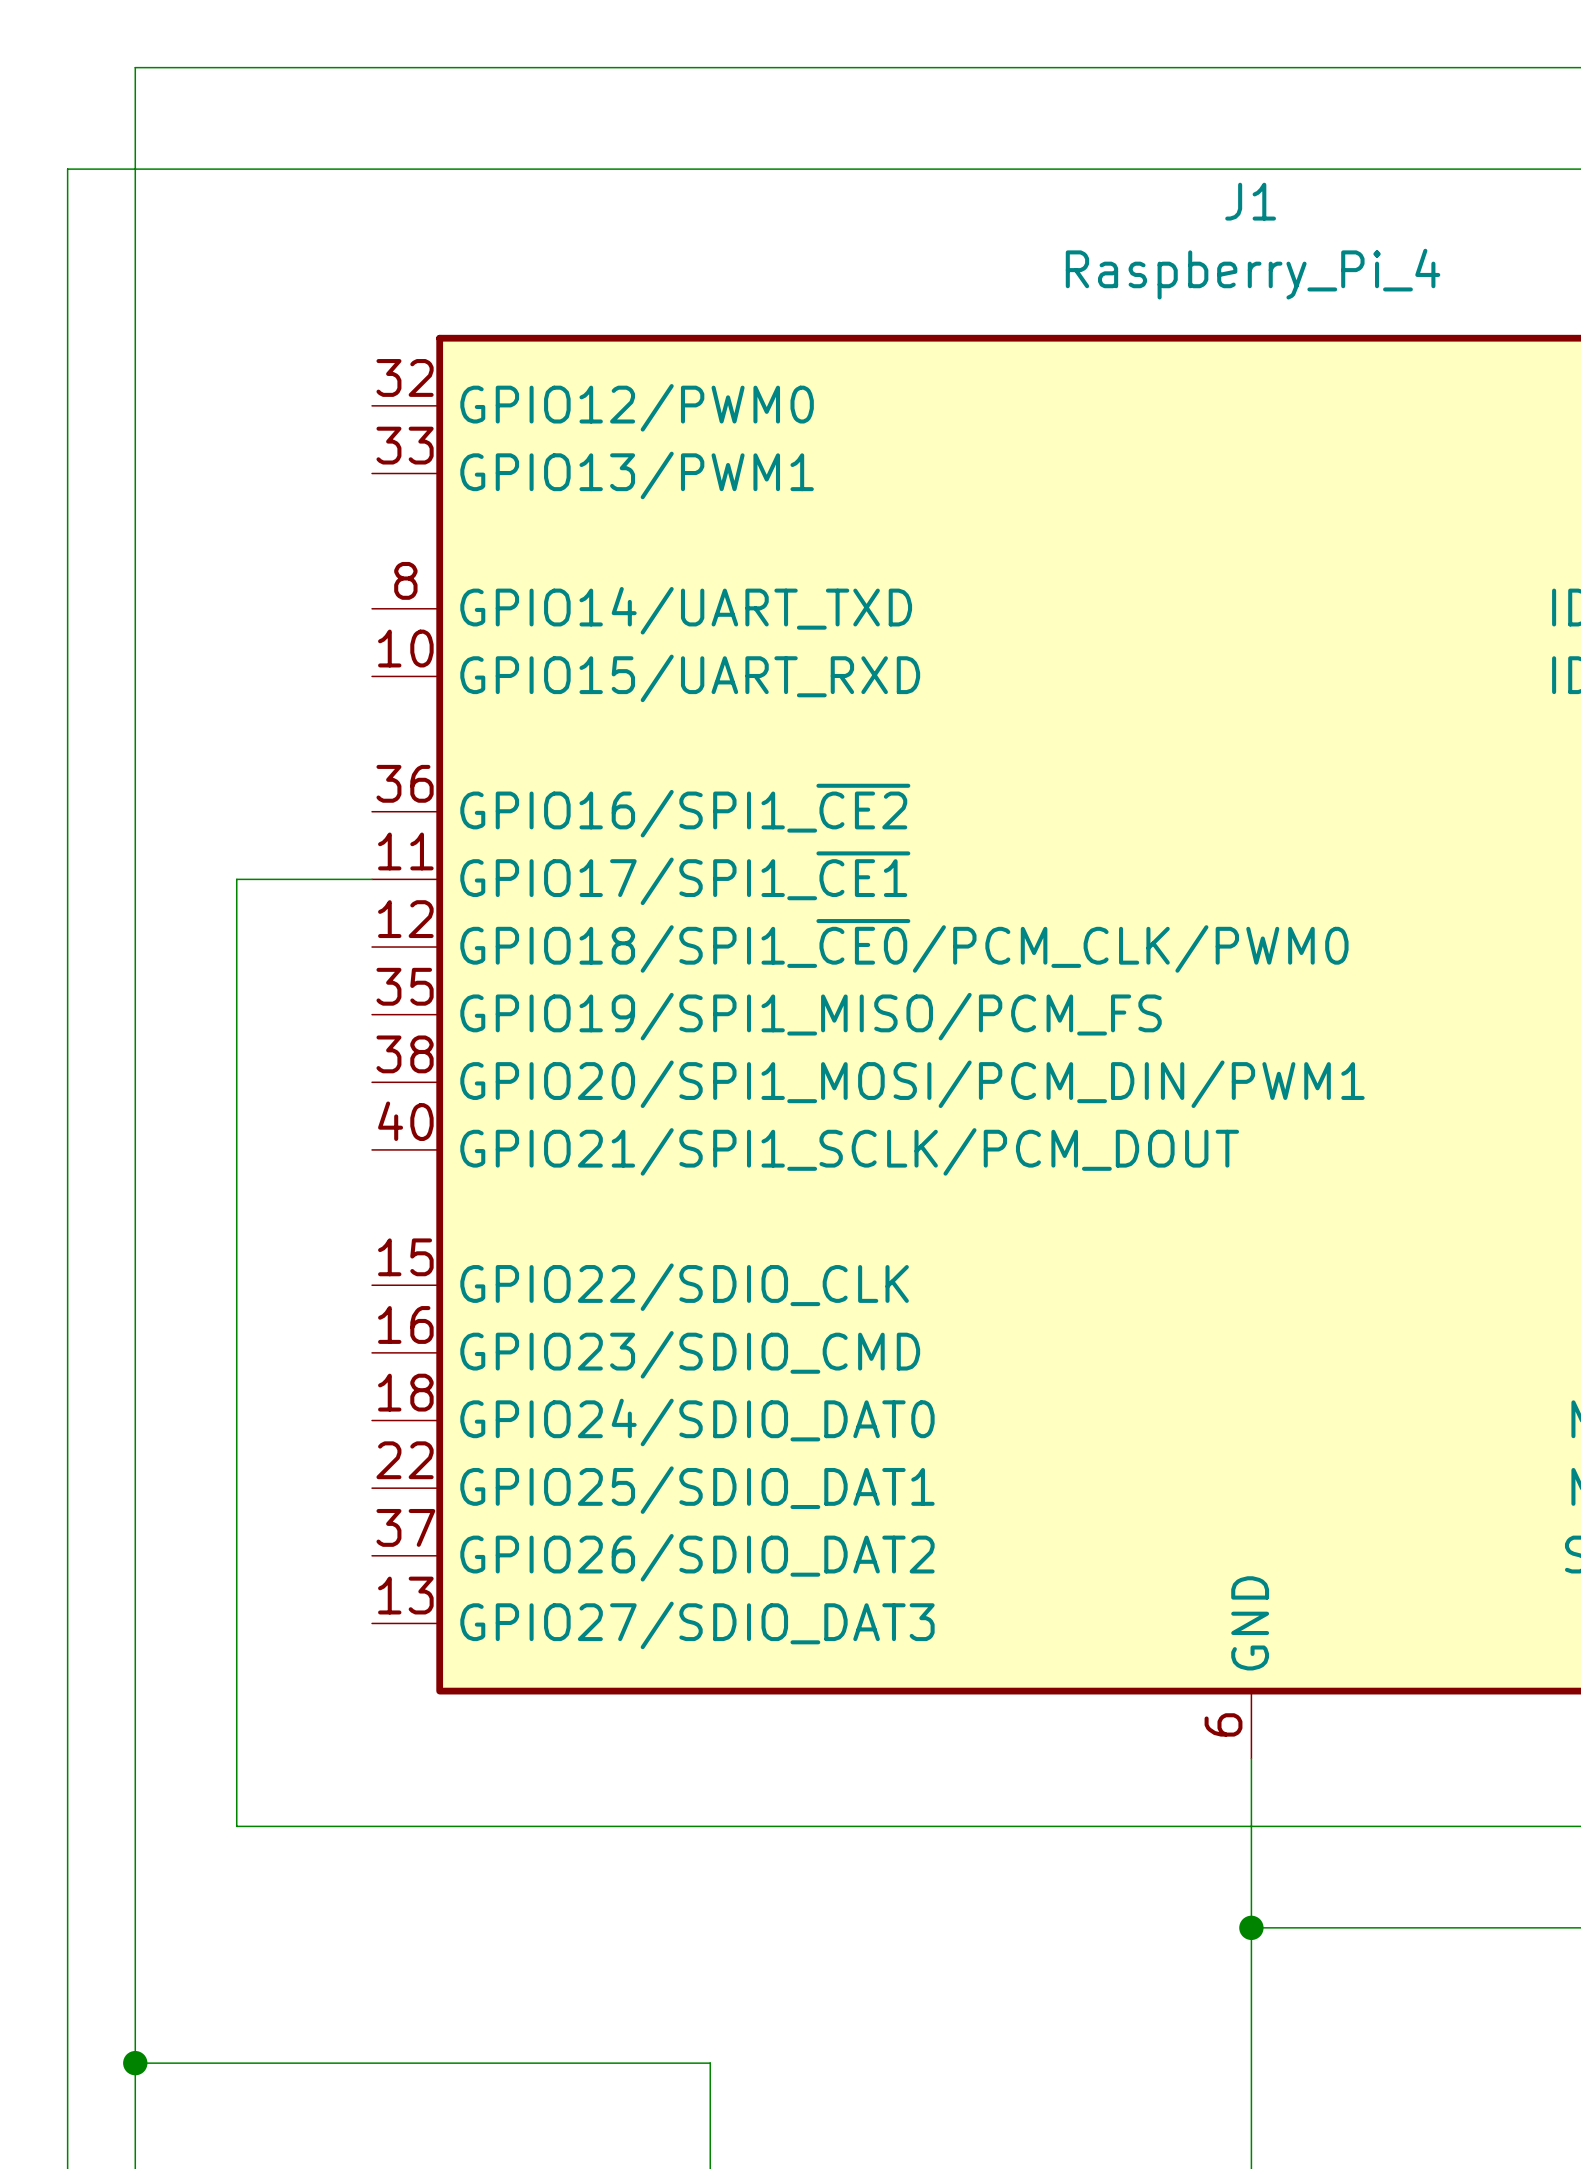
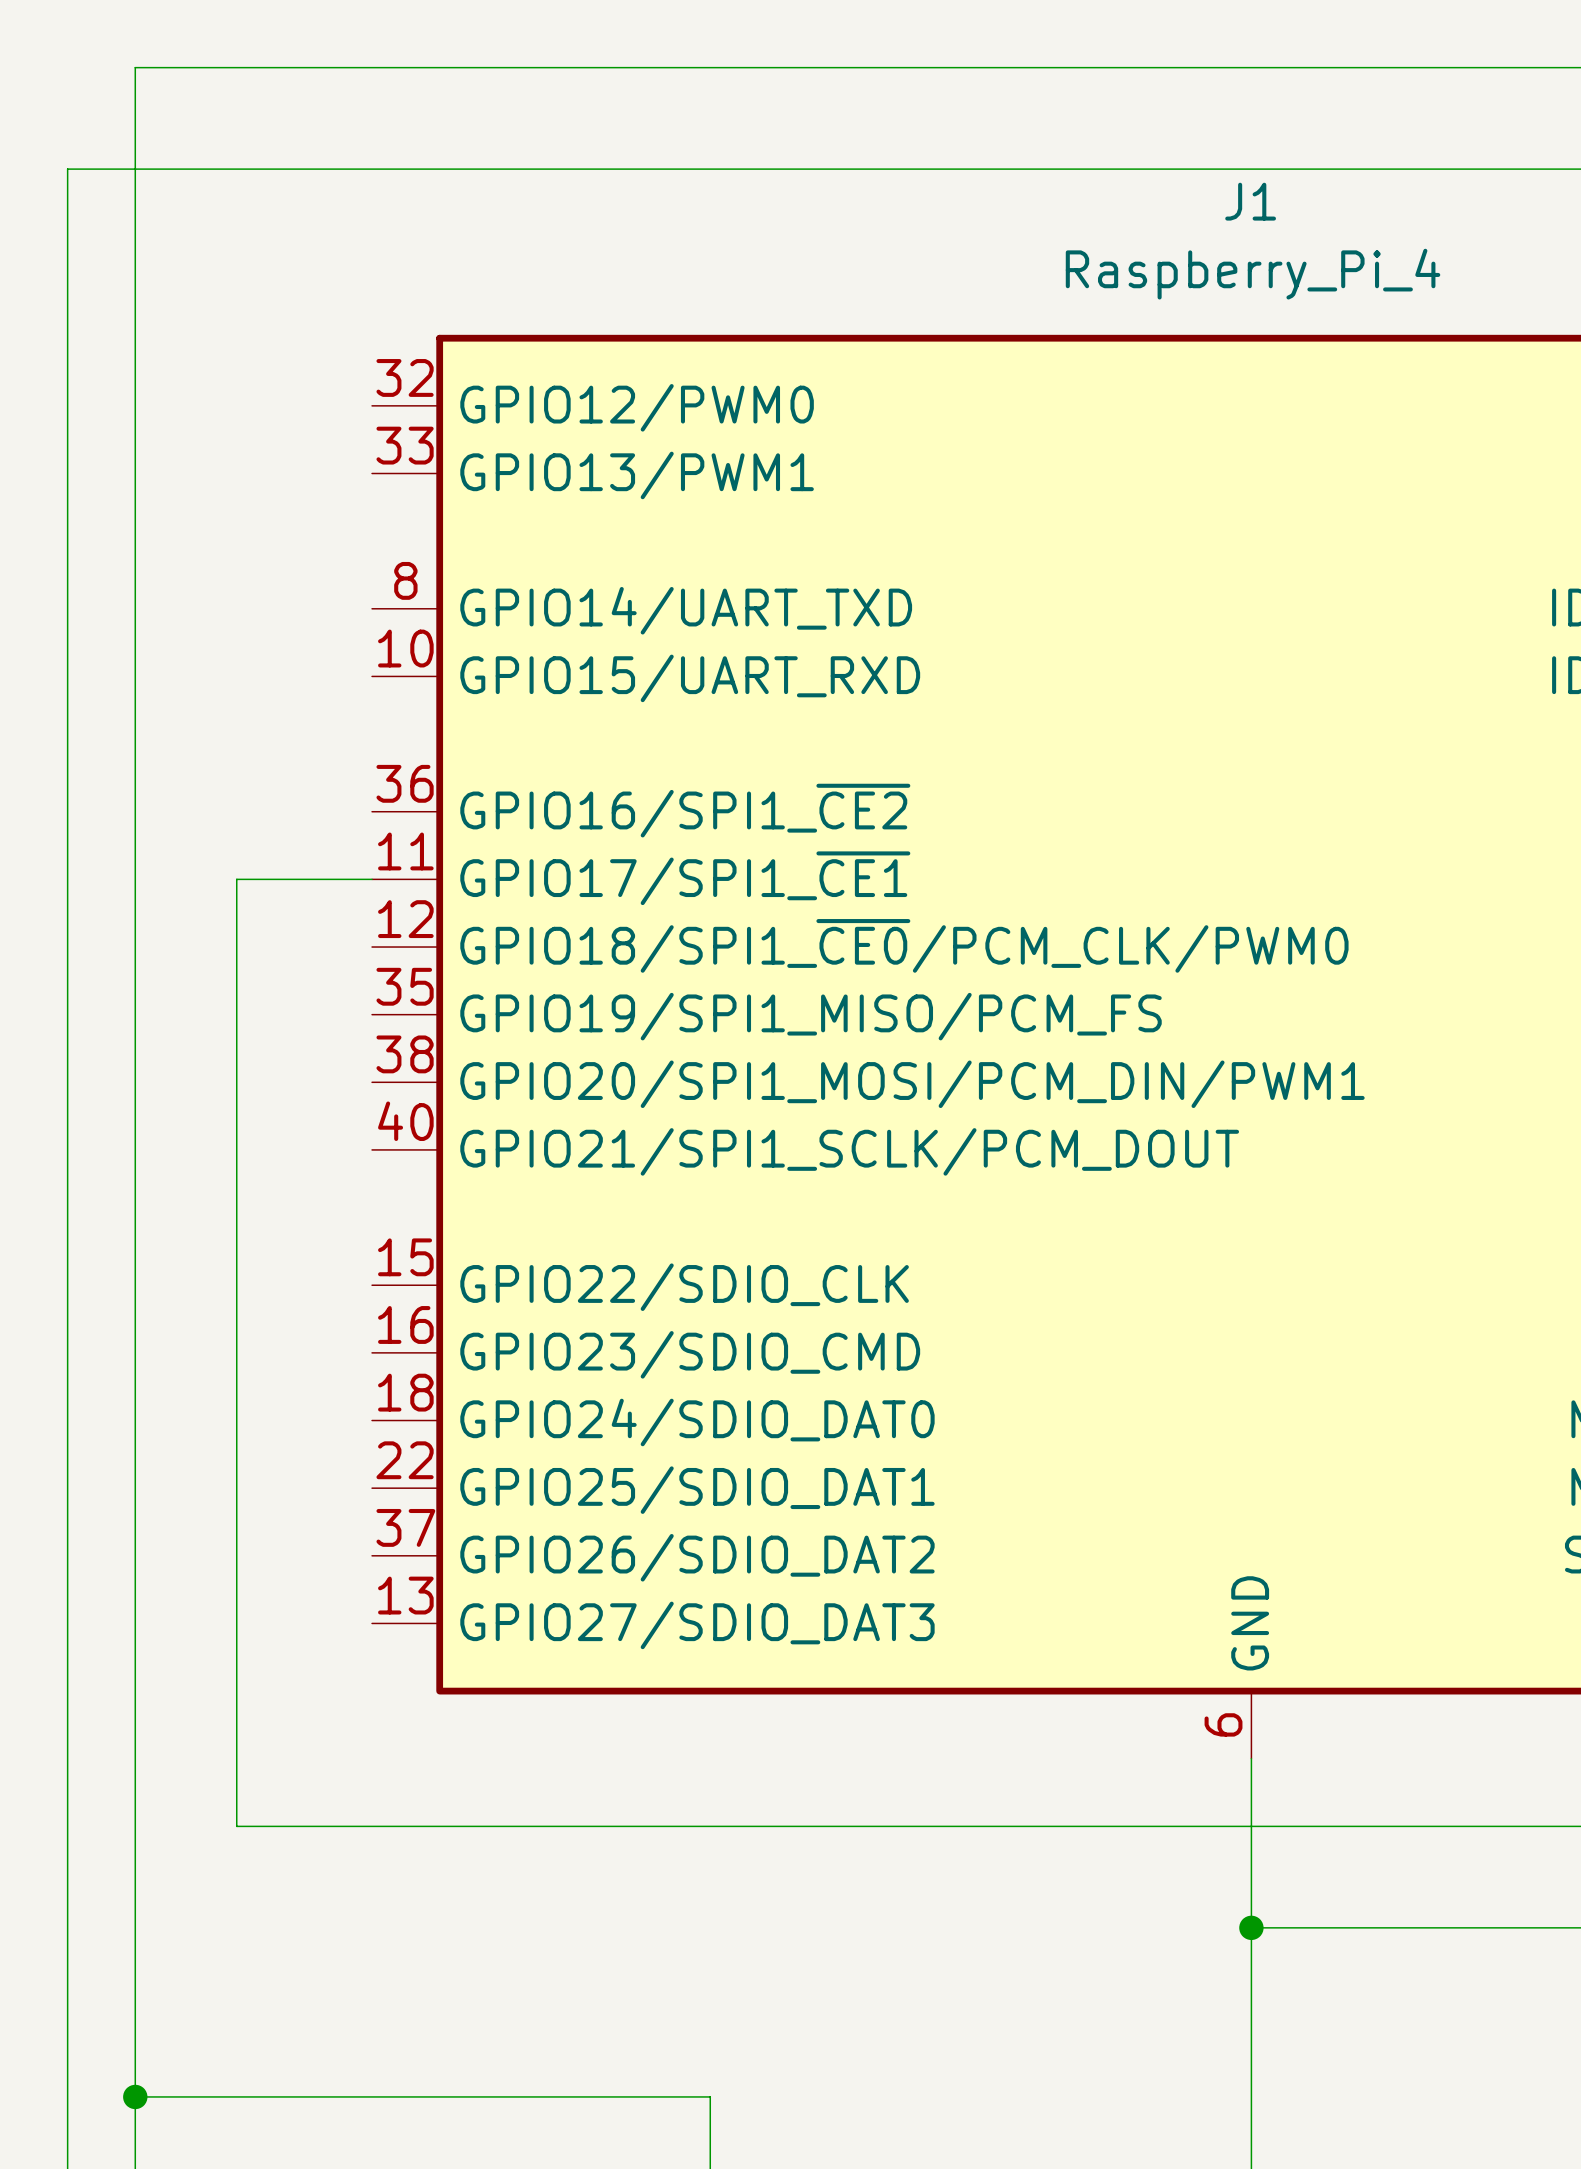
wire: (135, 2063) (710, 2063) (710, 2096) -> (135, 2096) (710, 2096)
junction position: (135, 2063) -> (135, 2096)

